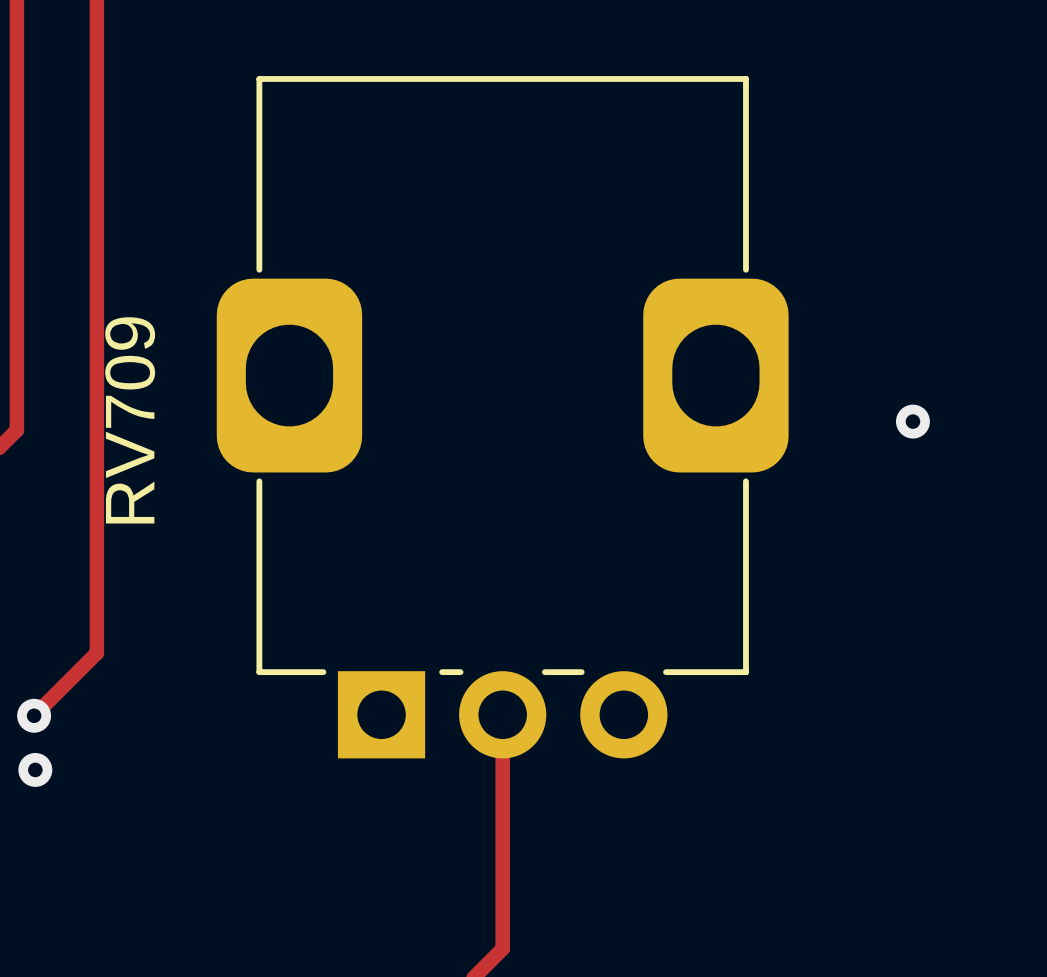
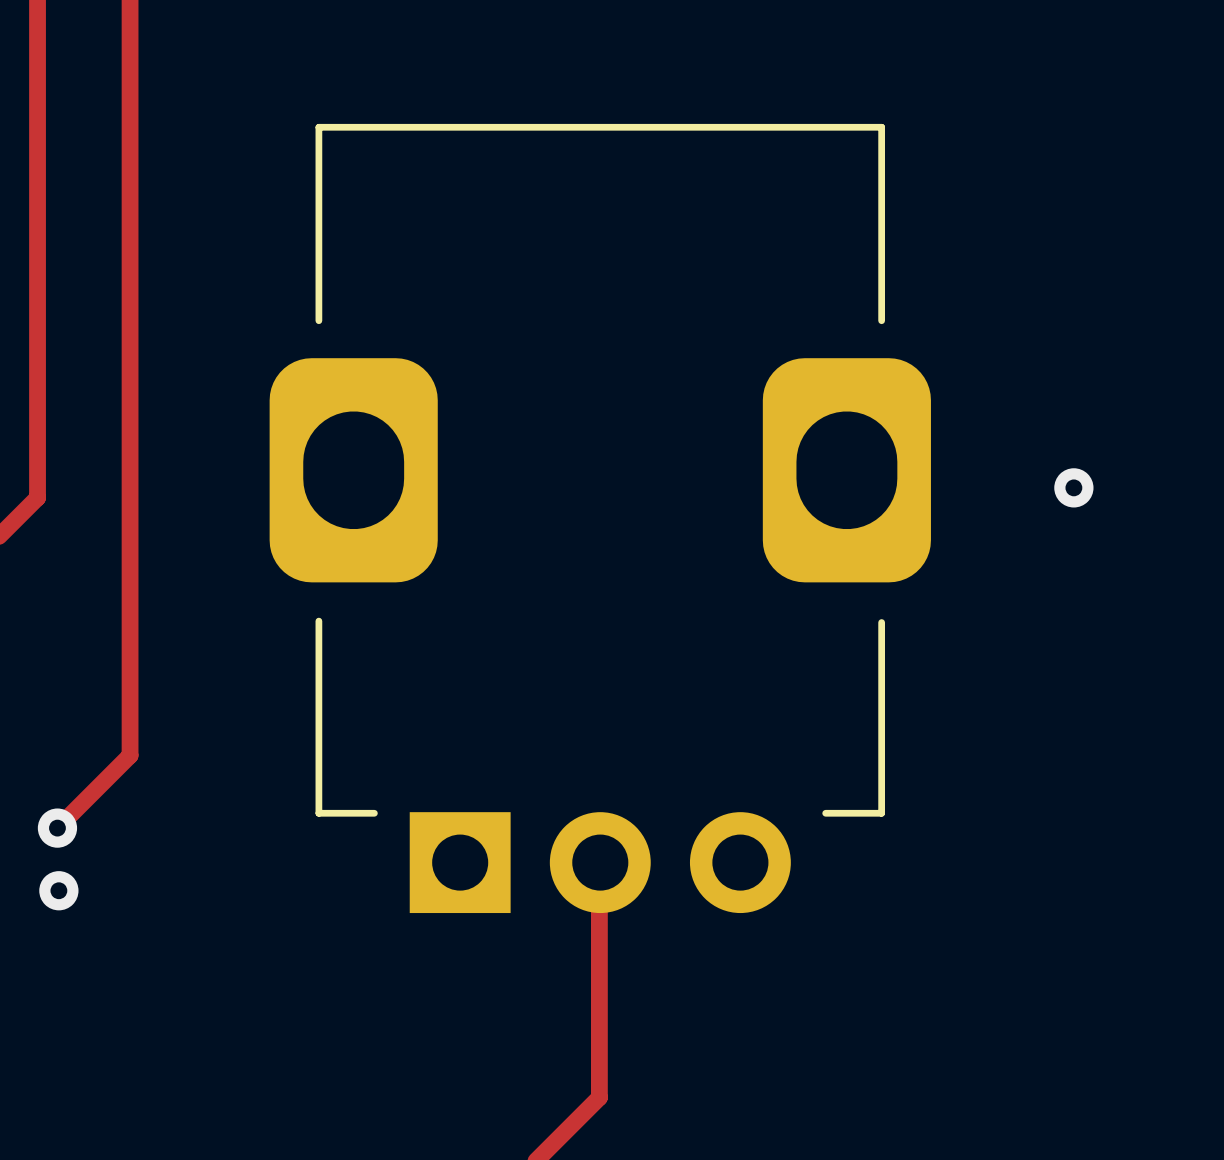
RV709: (502, 417) -> none
part: none -> (600, 518)

